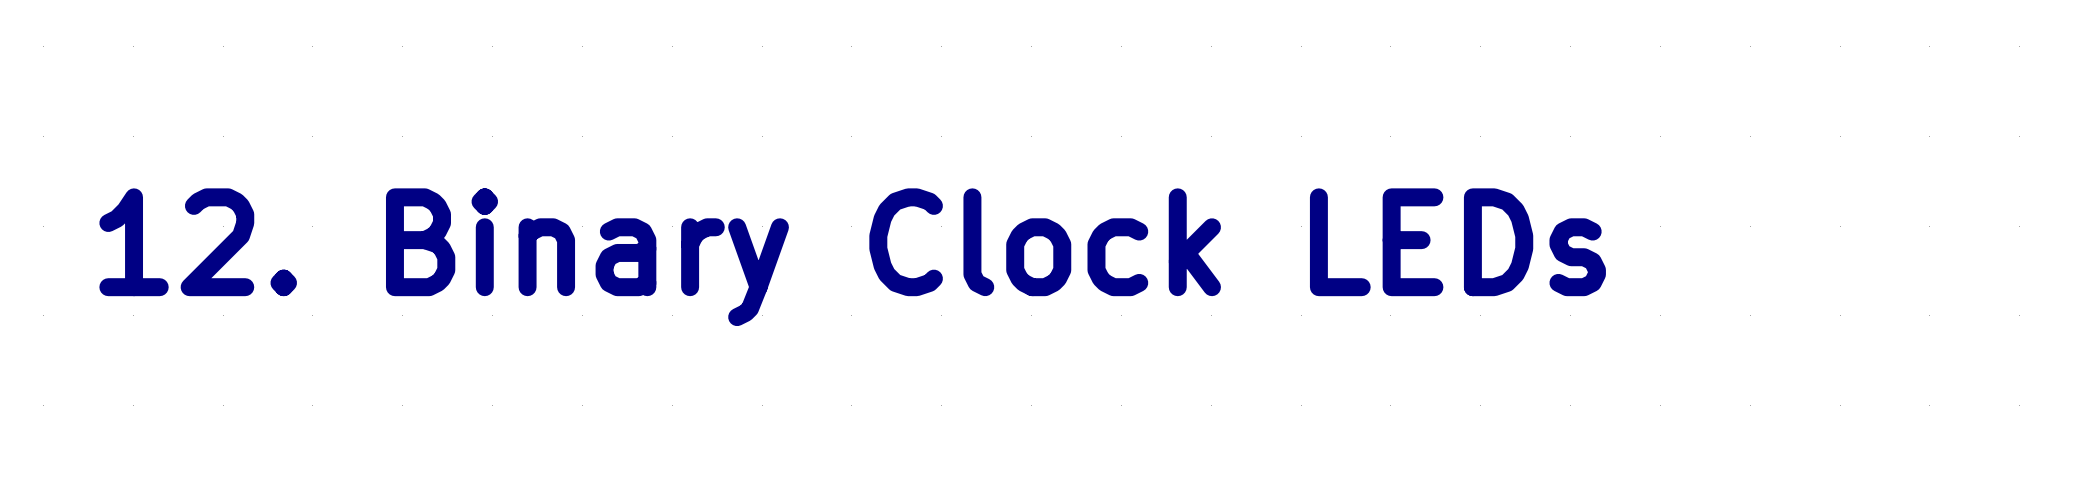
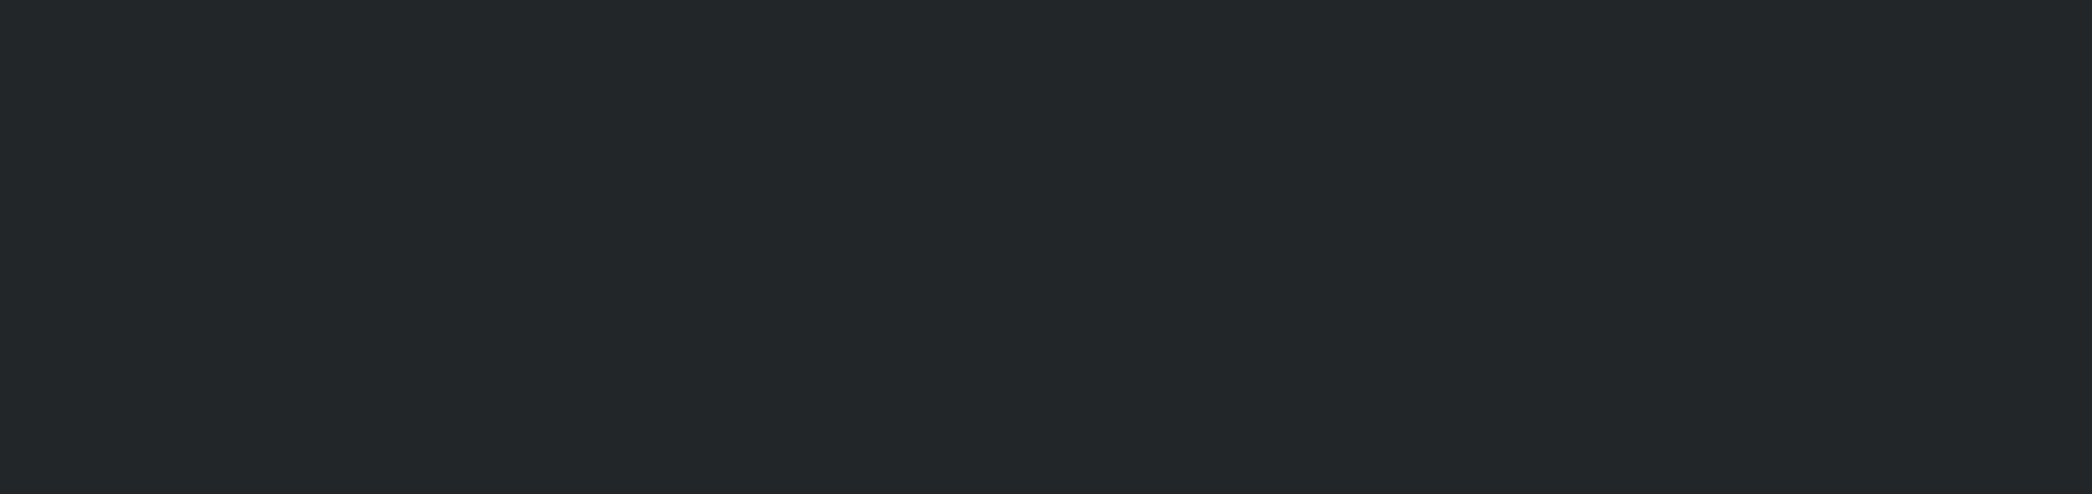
text: 12. Binary Clock LEDs (852, 257) -> none

